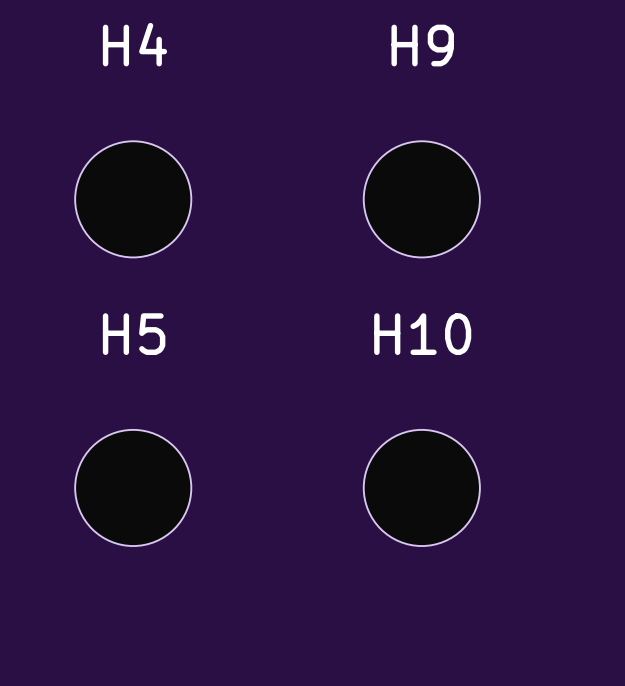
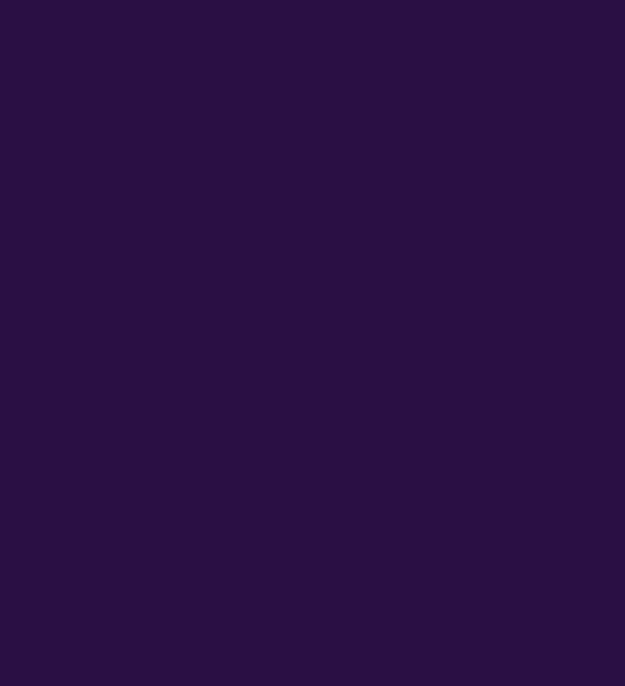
H4: (133, 199) -> none
H9: (421, 199) -> none
H5: (133, 487) -> none
H10: (421, 487) -> none

